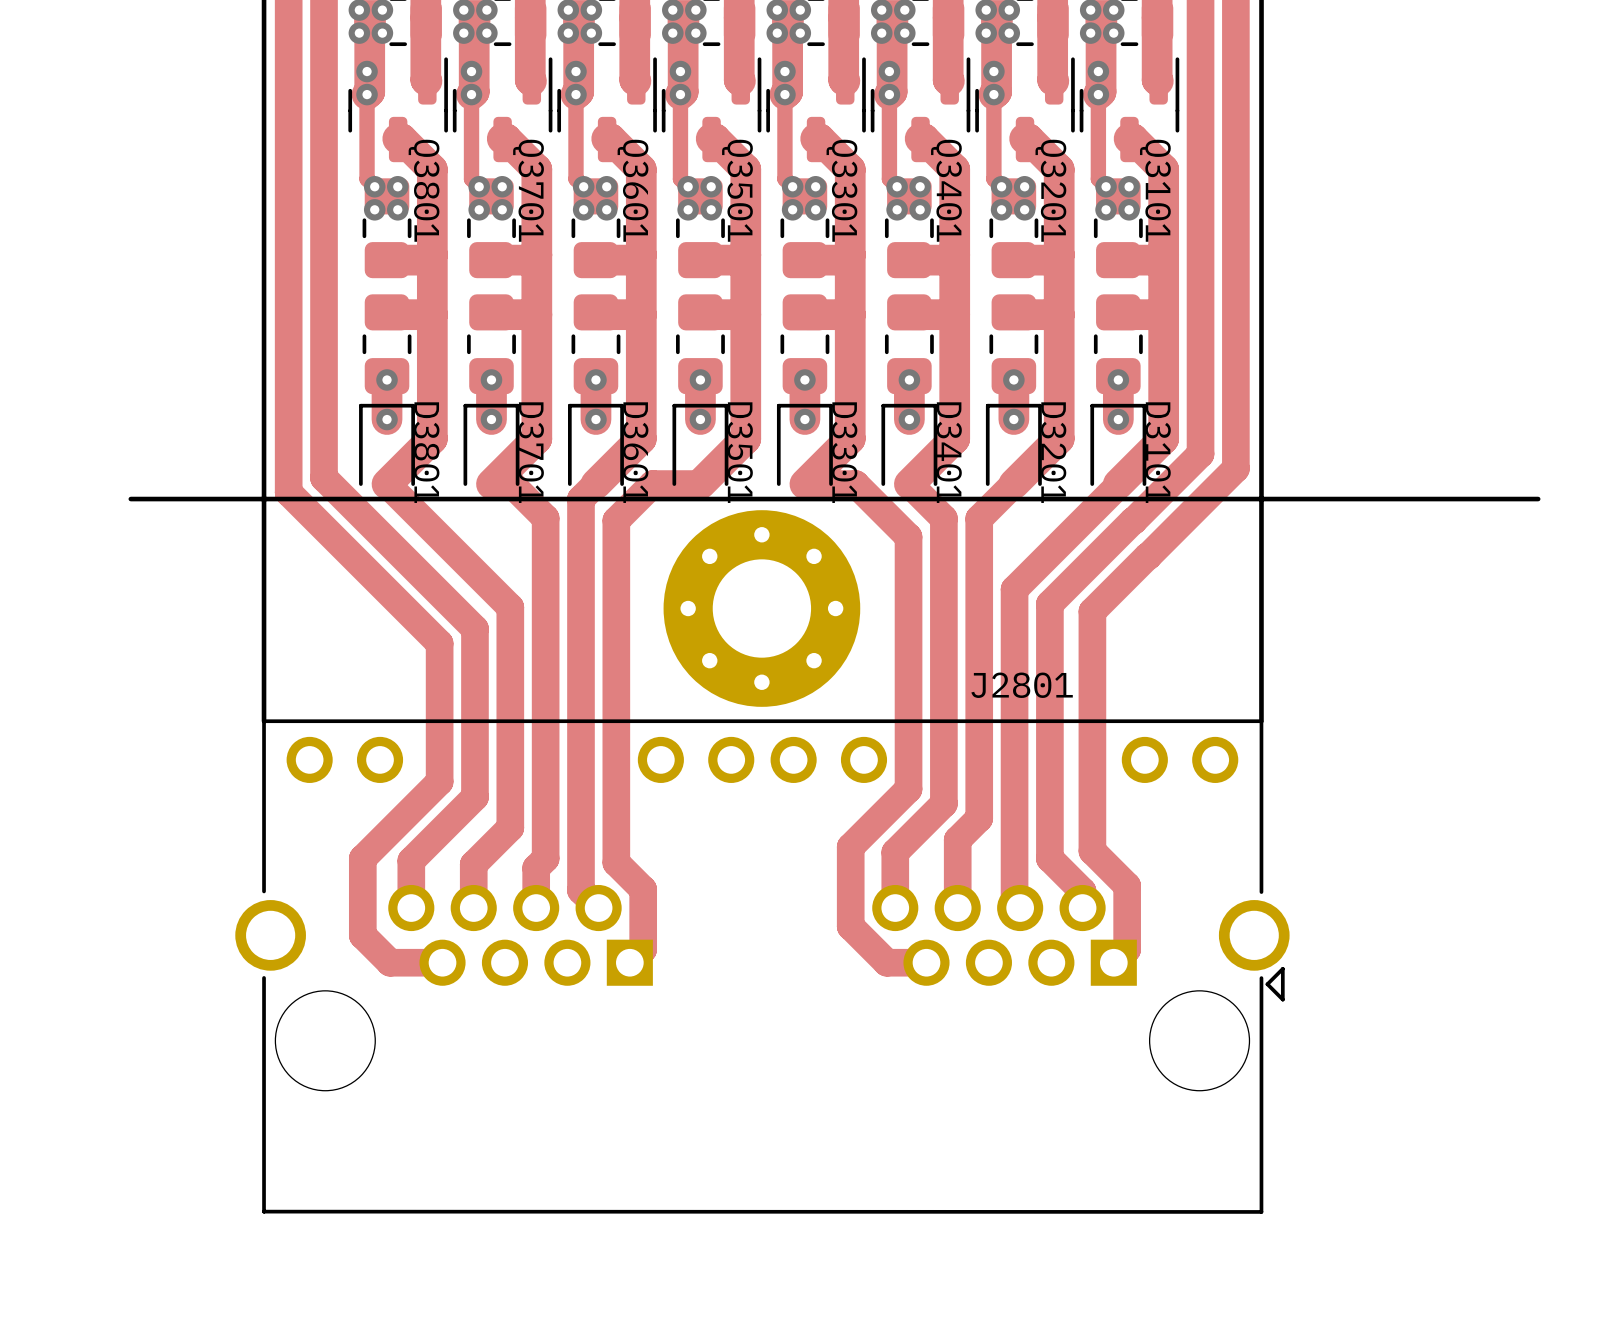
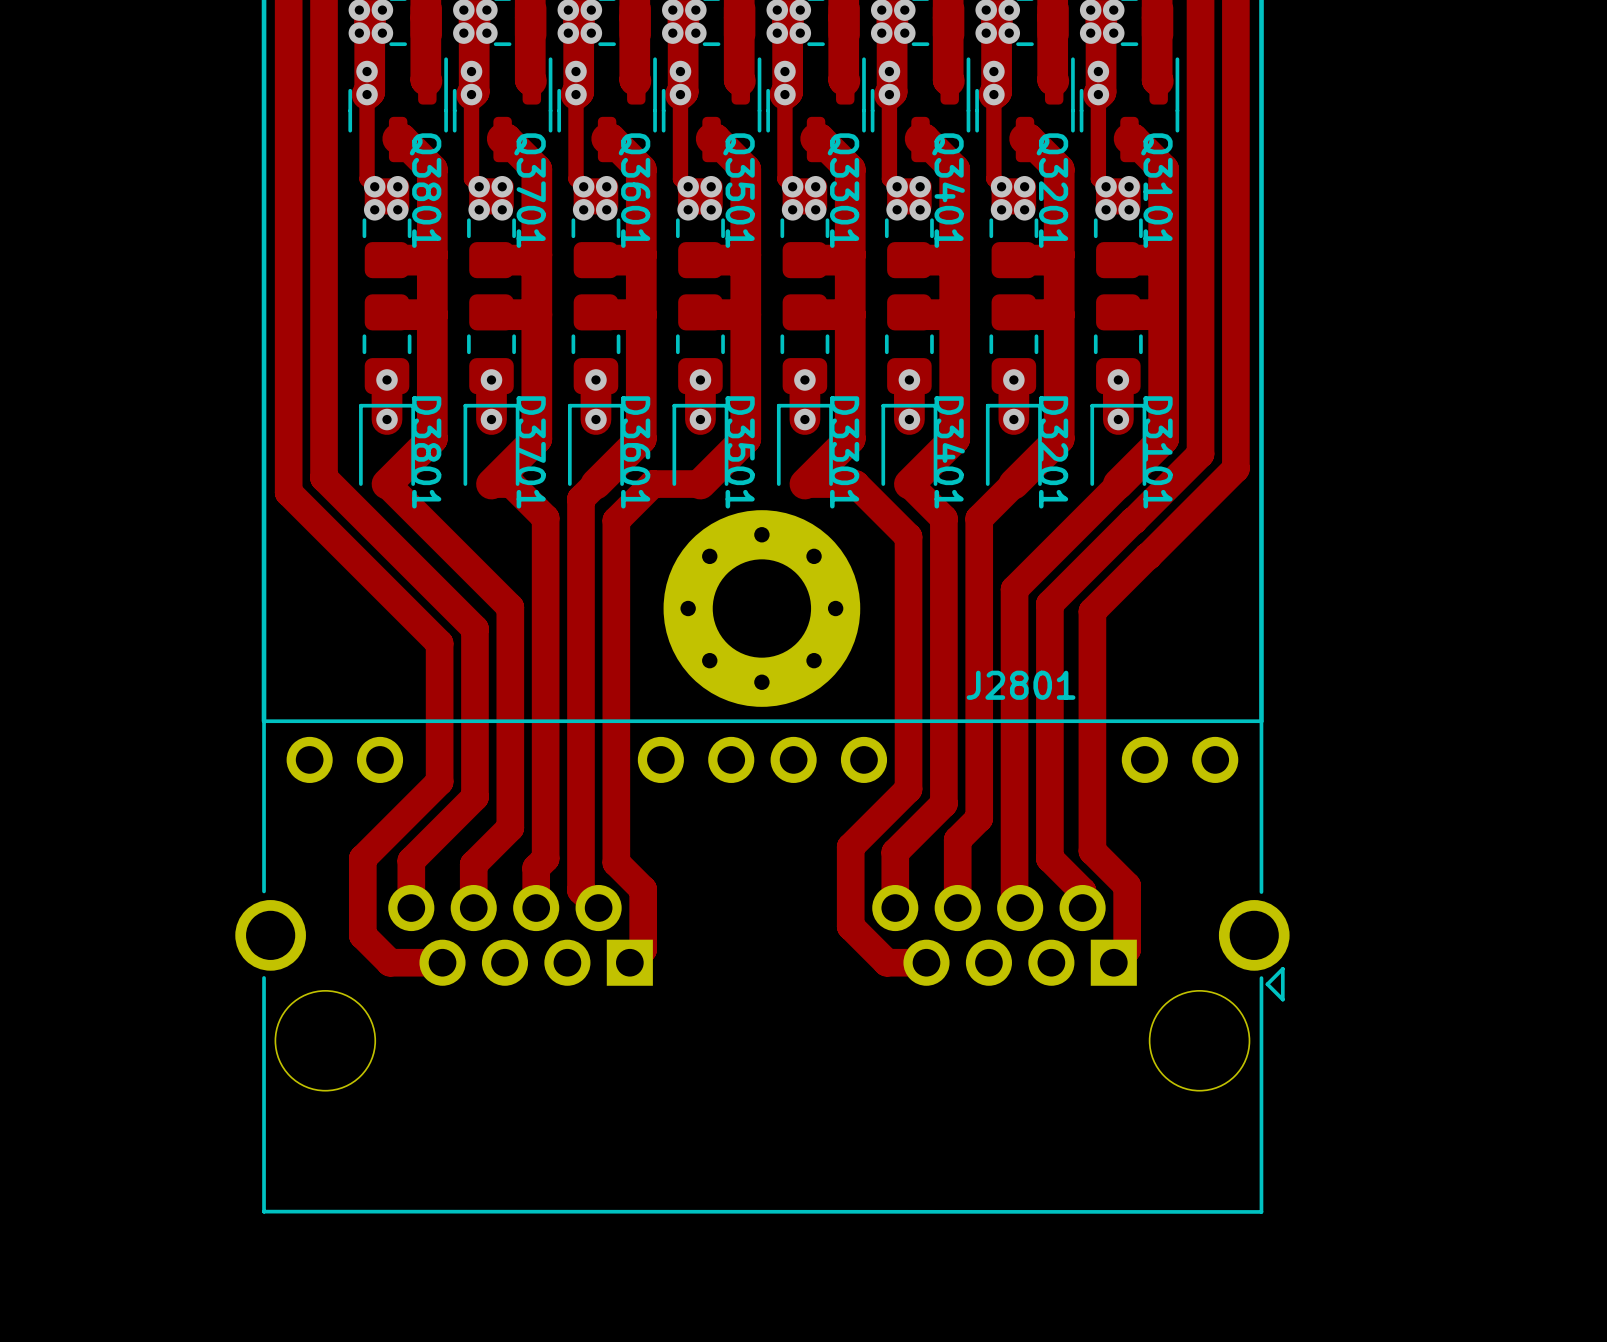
line: (130, 499) (1538, 499) -> none

